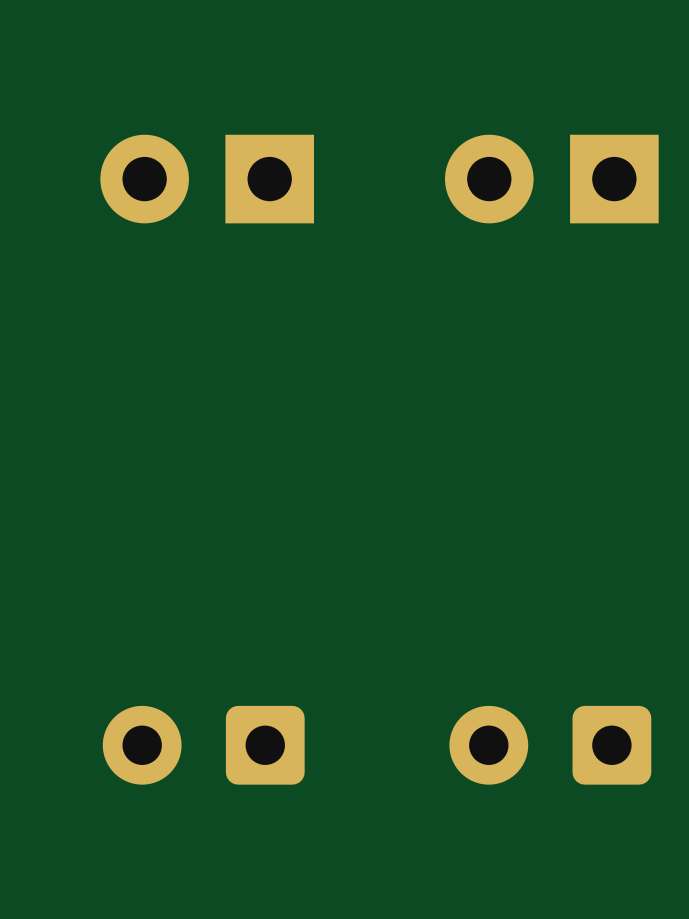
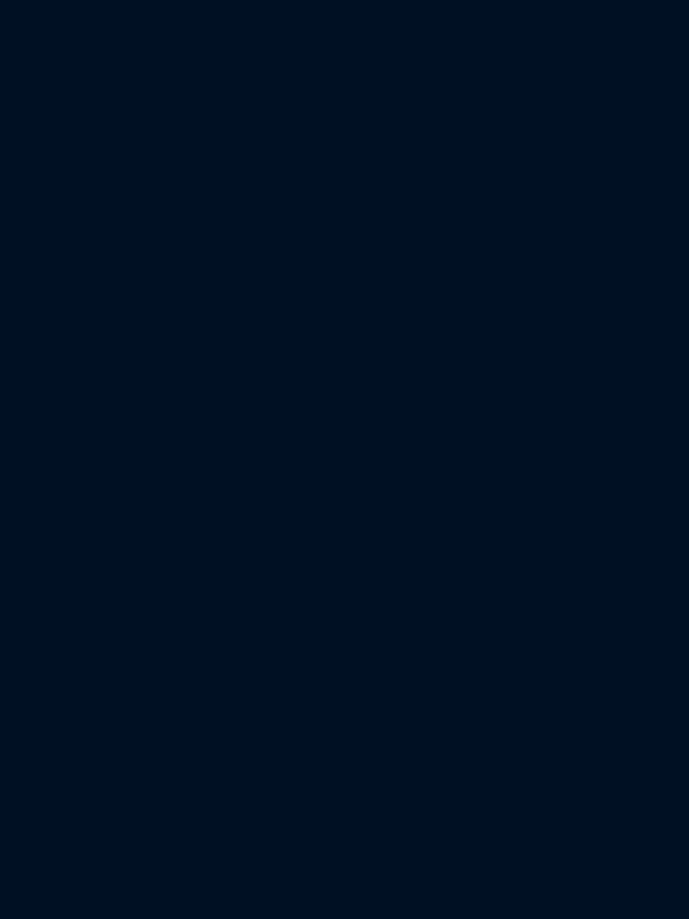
part: (207, 179) -> none
part: (551, 179) -> none
part: (203, 745) -> none
part: (550, 745) -> none

